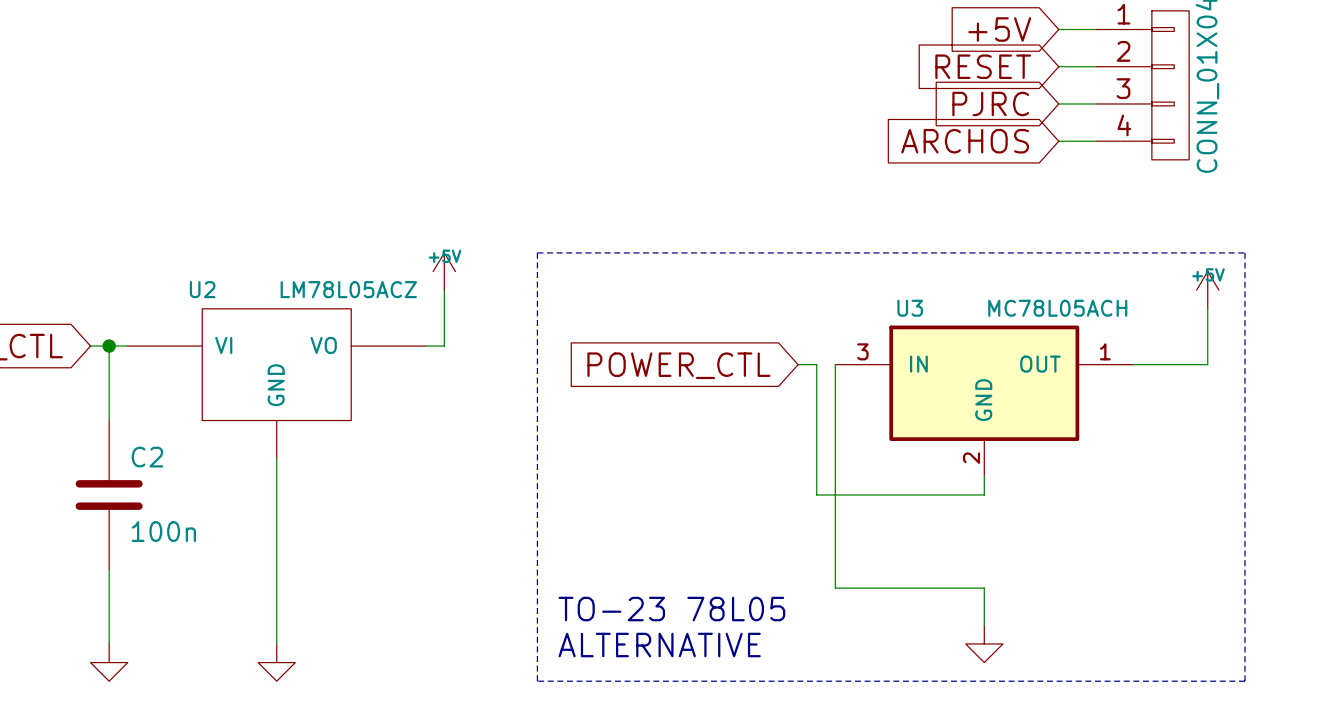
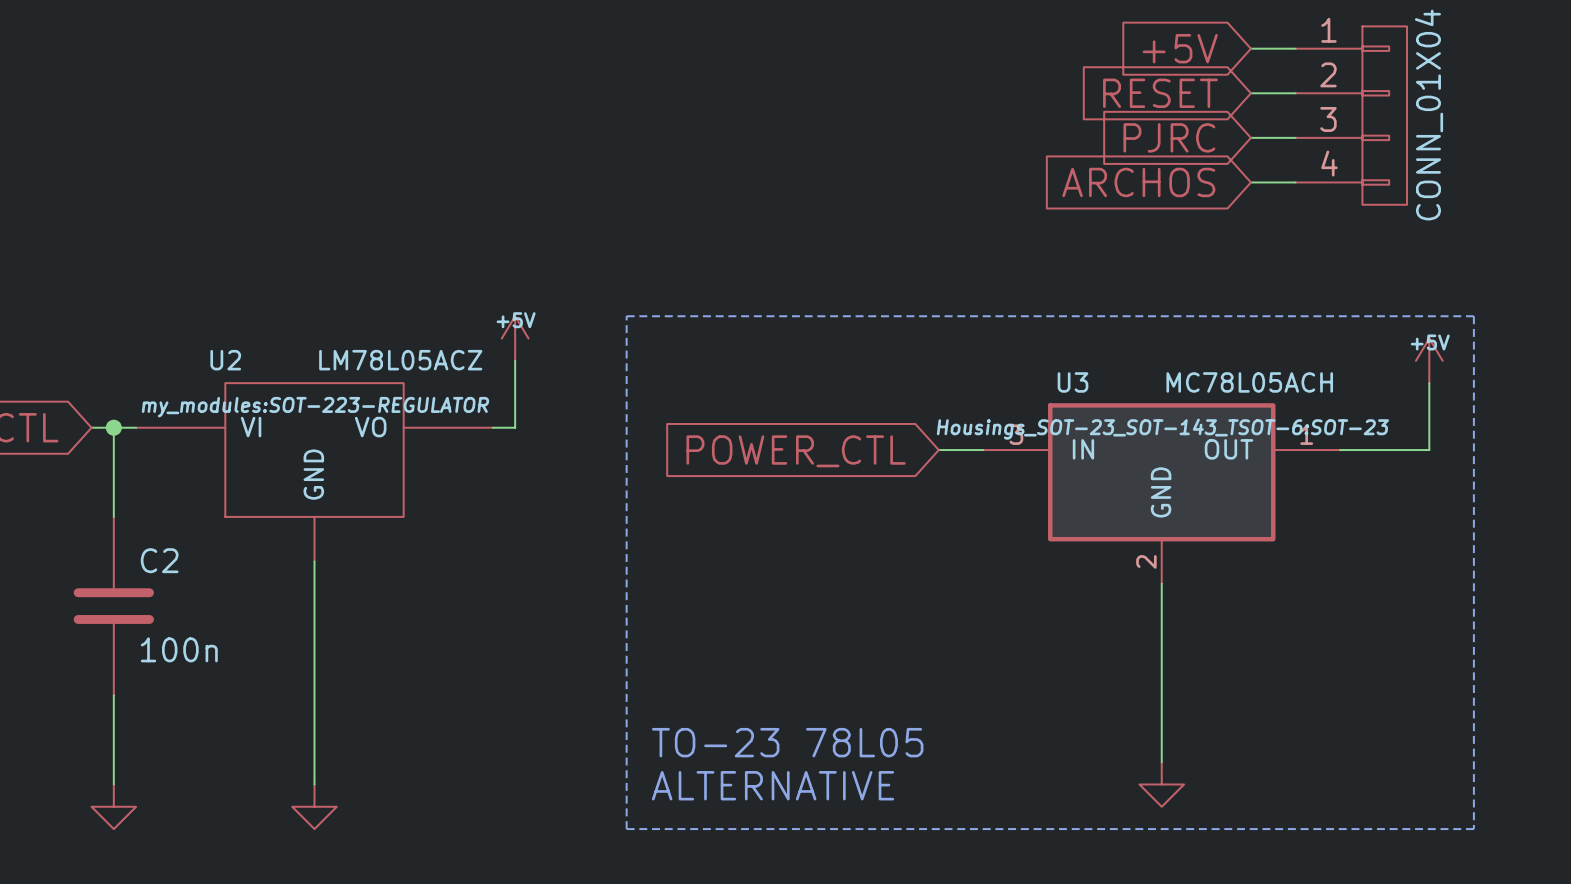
U2 text: none -> my_modules:SOT-223-REGULATOR (315, 407)
U3 text: none -> Housings_SOT-23_SOT-143_TSOT-6:SOT-23 (1162, 429)
wire: (816, 364) (816, 495) (984, 495) -> (961, 450) (983, 450)
wire: (835, 364) (835, 588) (984, 588) -> (1161, 606) (1161, 717)

